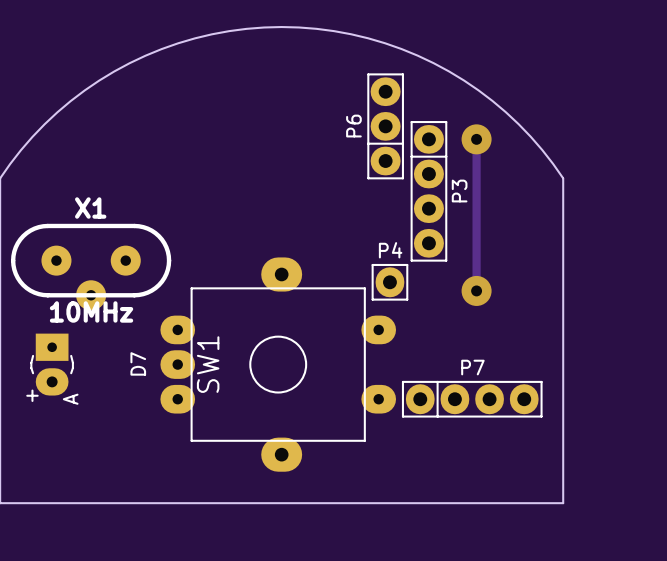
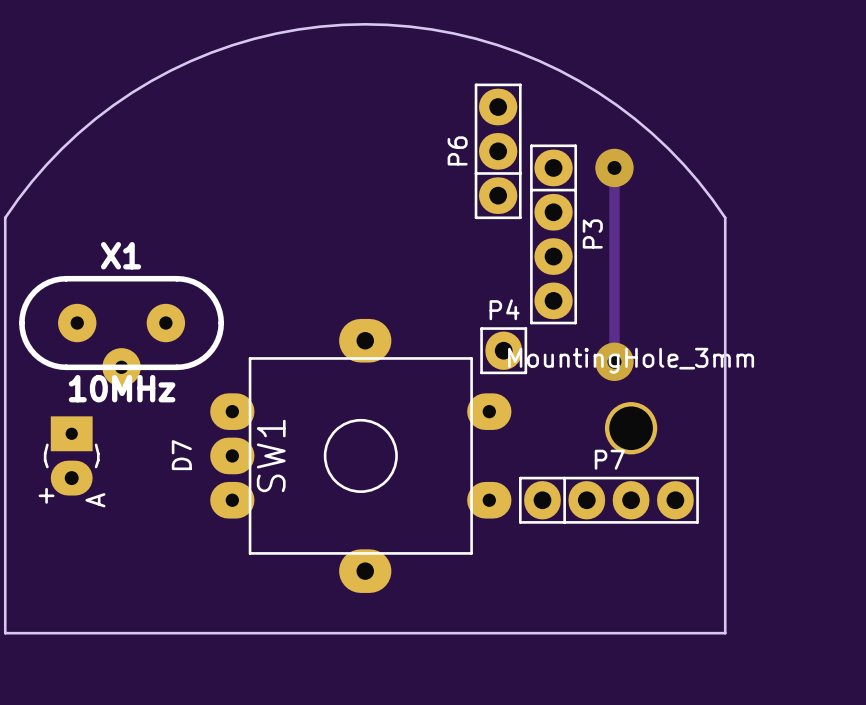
MountingHole_3mm: none -> (631, 428)

